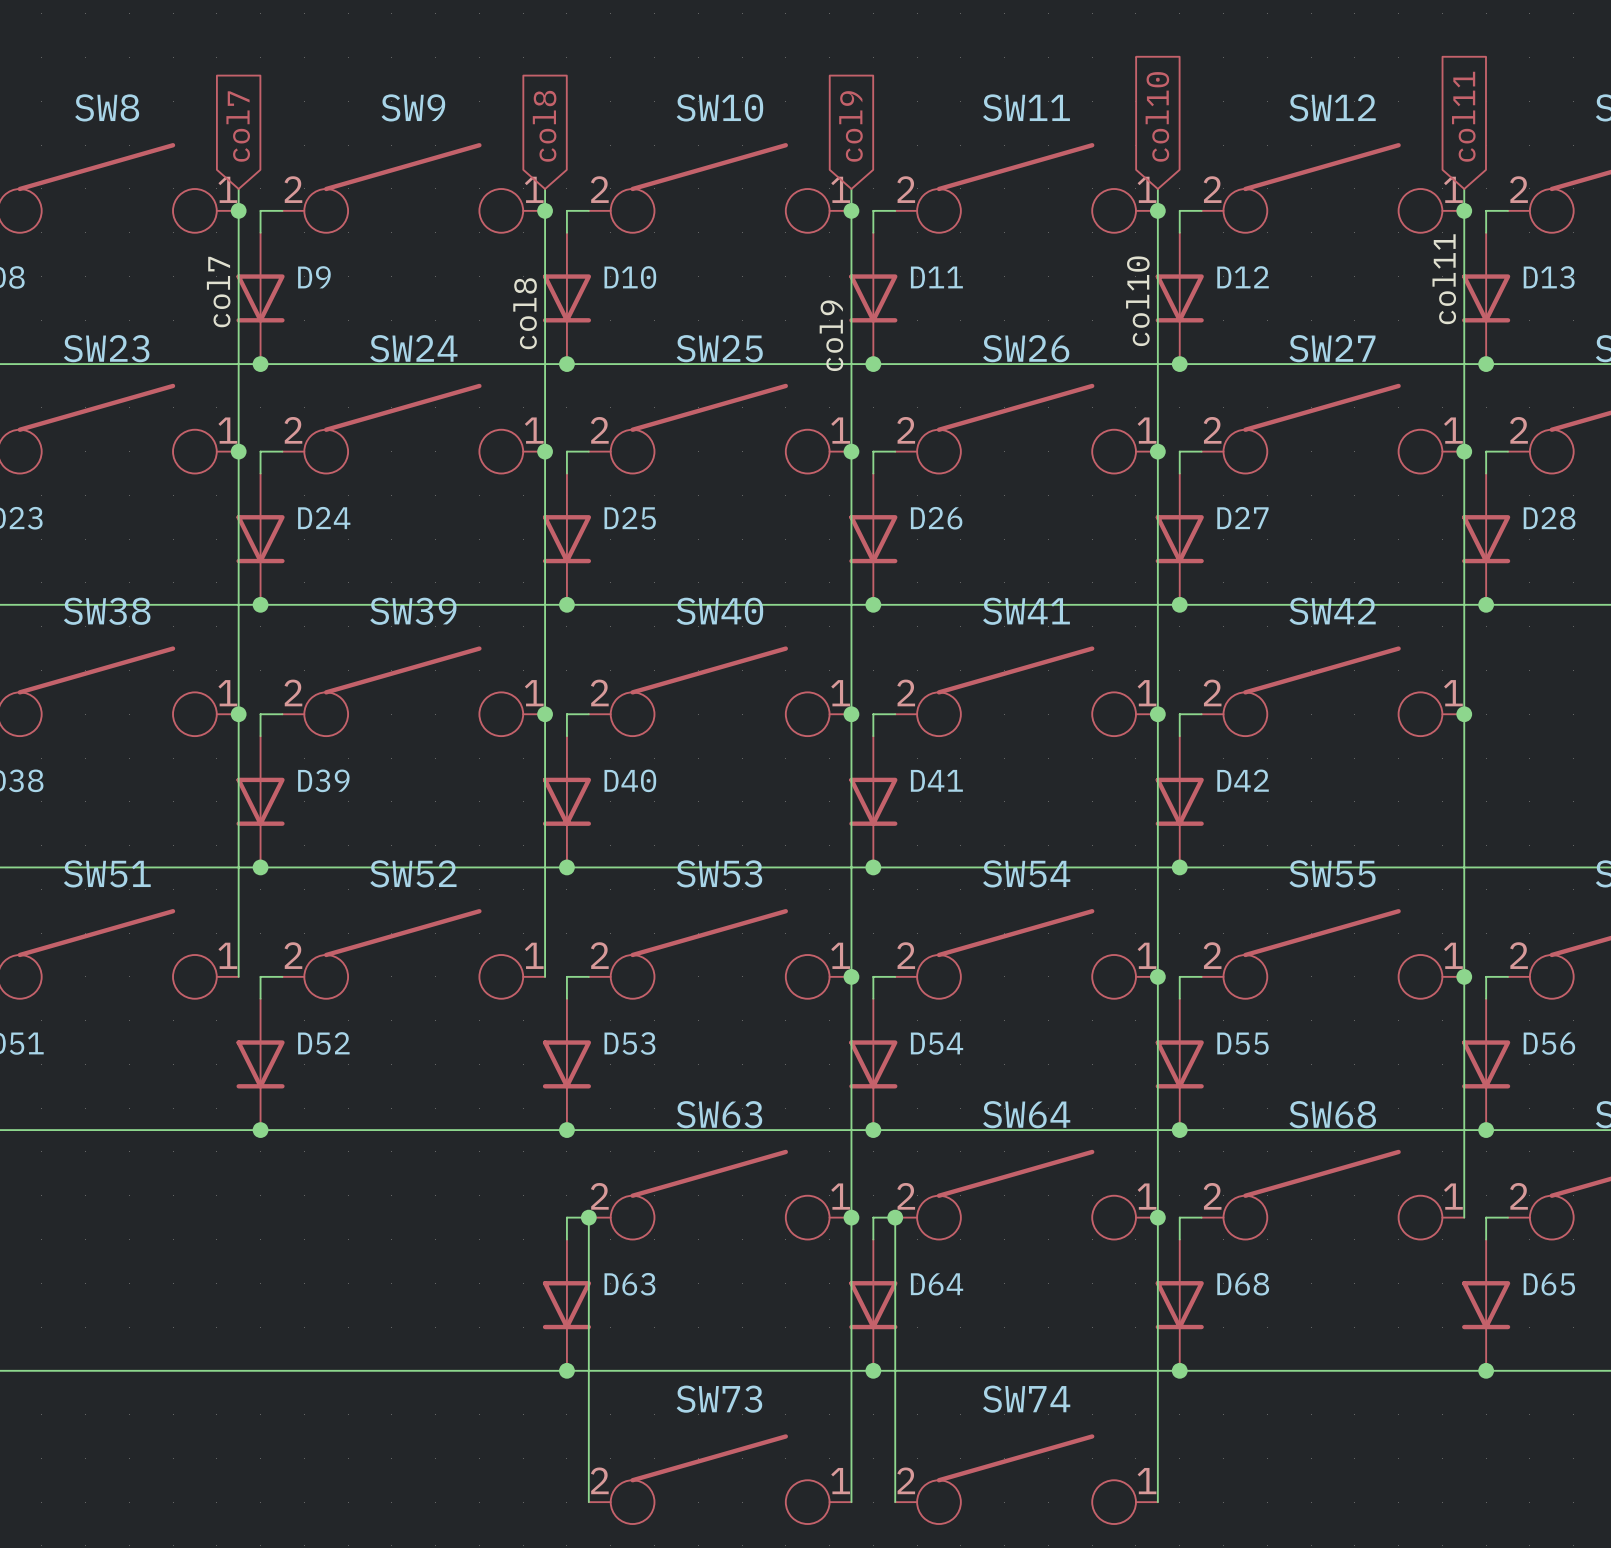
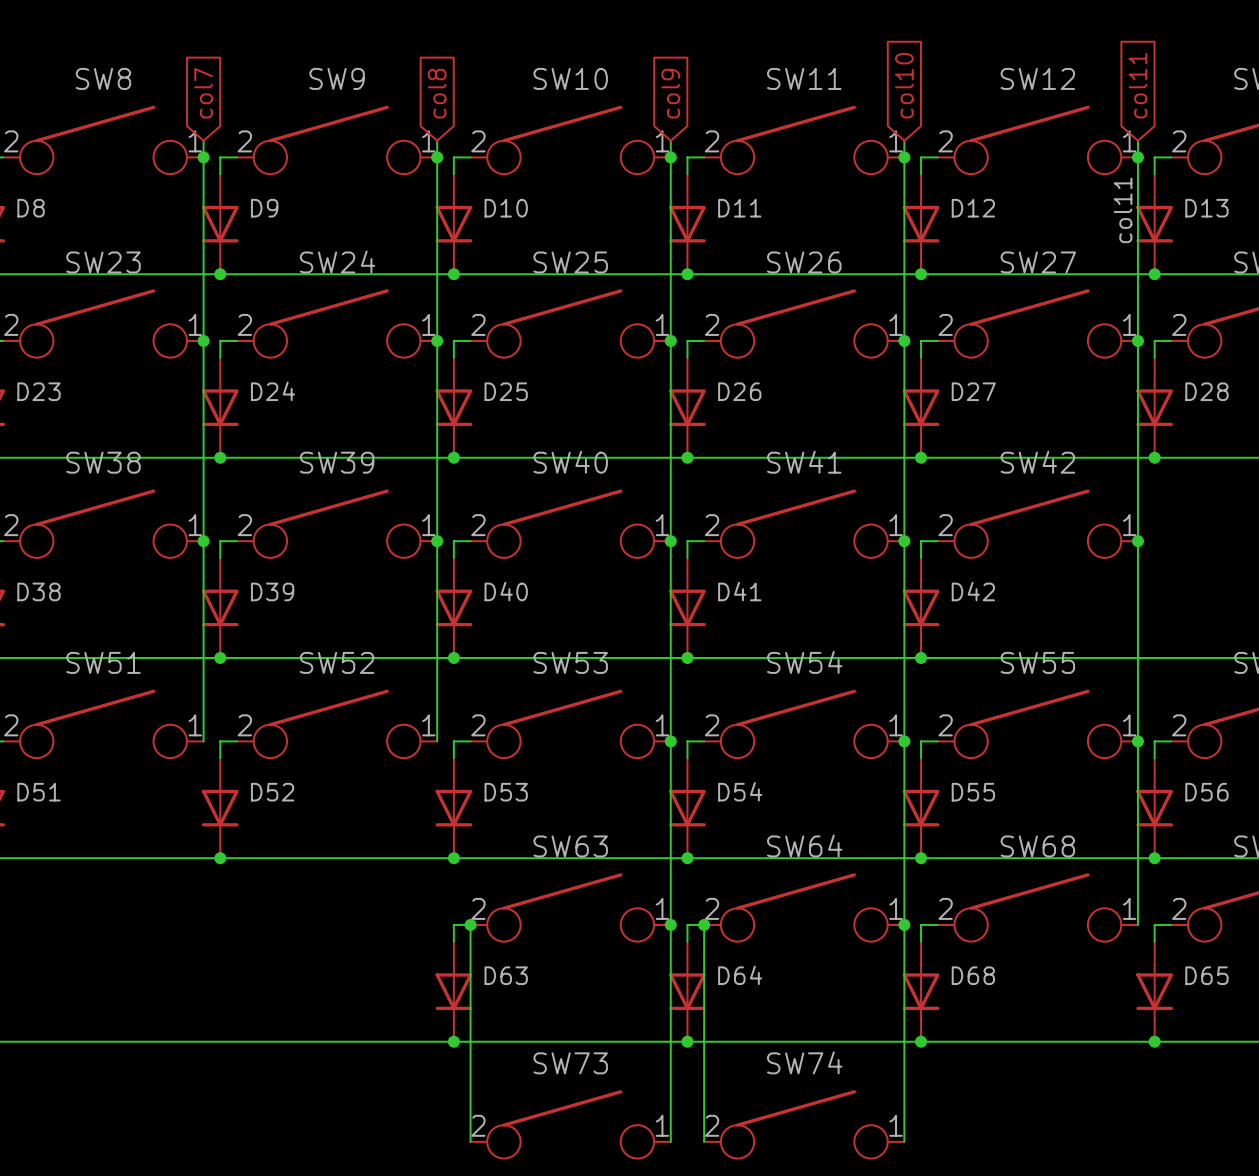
label: col7 (218, 292) -> none
label: col10 (1137, 301) -> none
label: col8 (525, 313) -> none
label: col9 (831, 335) -> none

